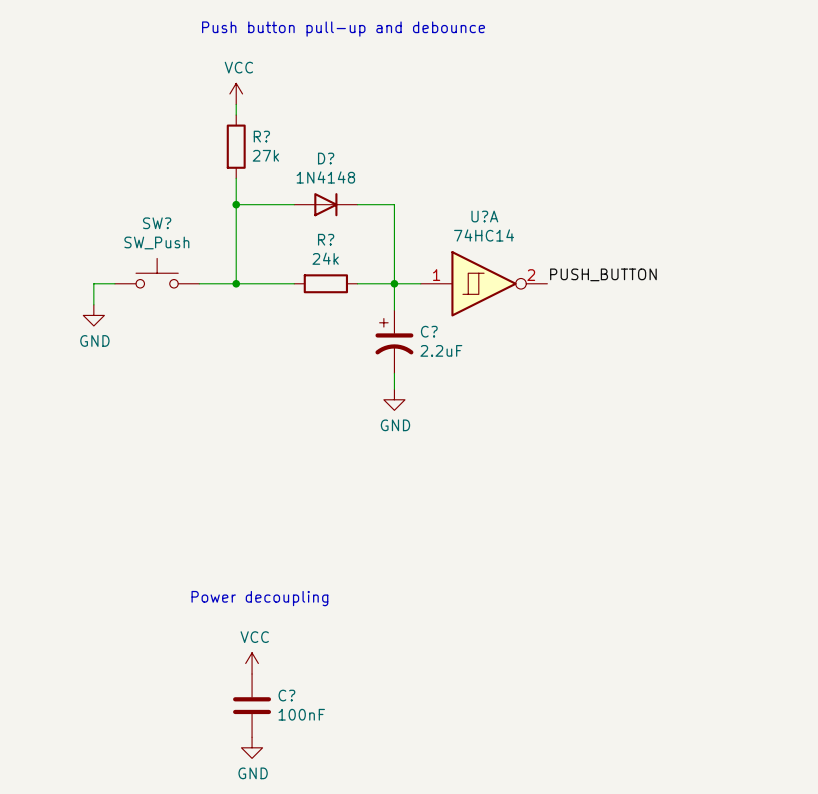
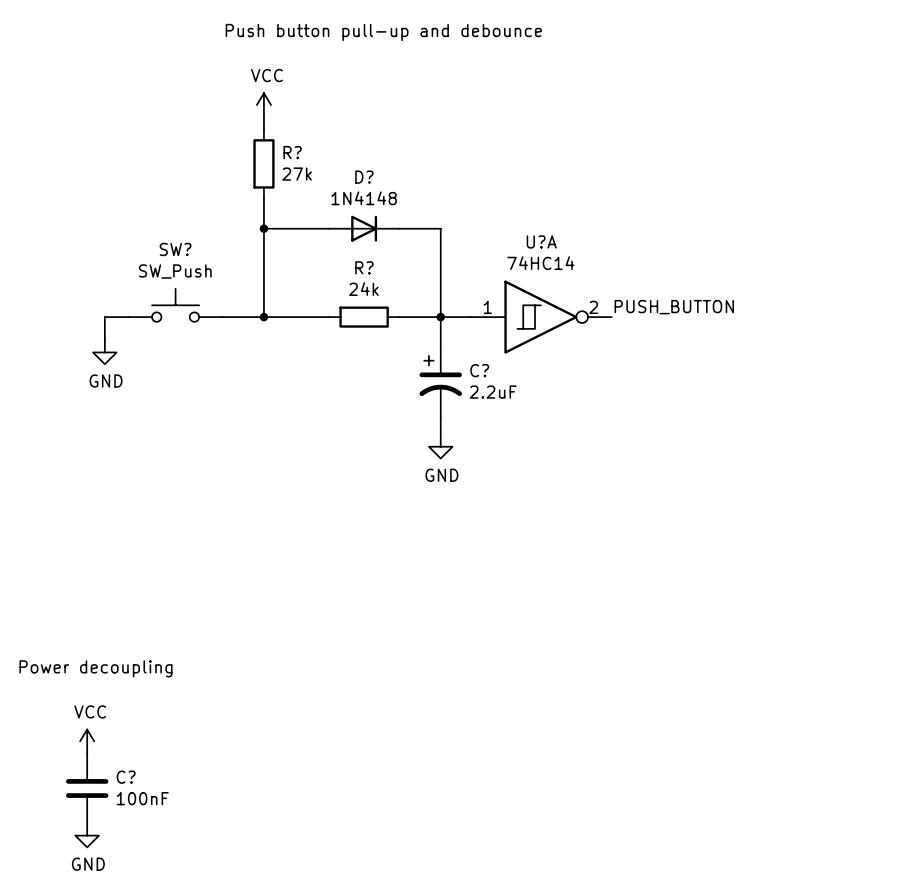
text position: Power decoupling (259, 598) -> Power decoupling (95, 668)
power symbol position: VCC (252, 663) -> VCC (87, 741)
C? position: (252, 705) -> (87, 788)
power symbol position: GND (252, 747) -> GND (87, 835)

